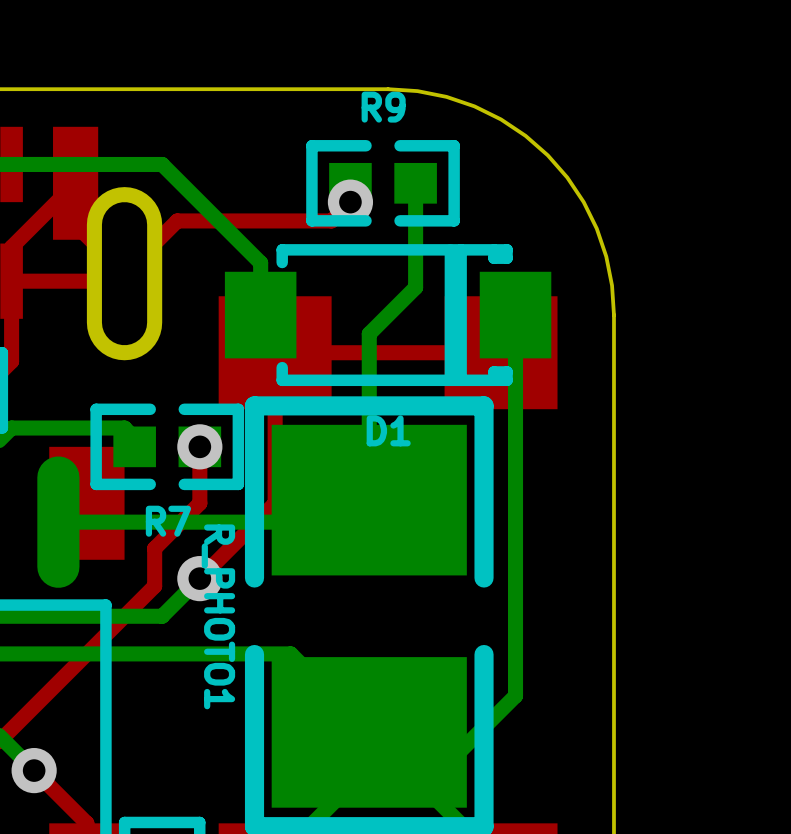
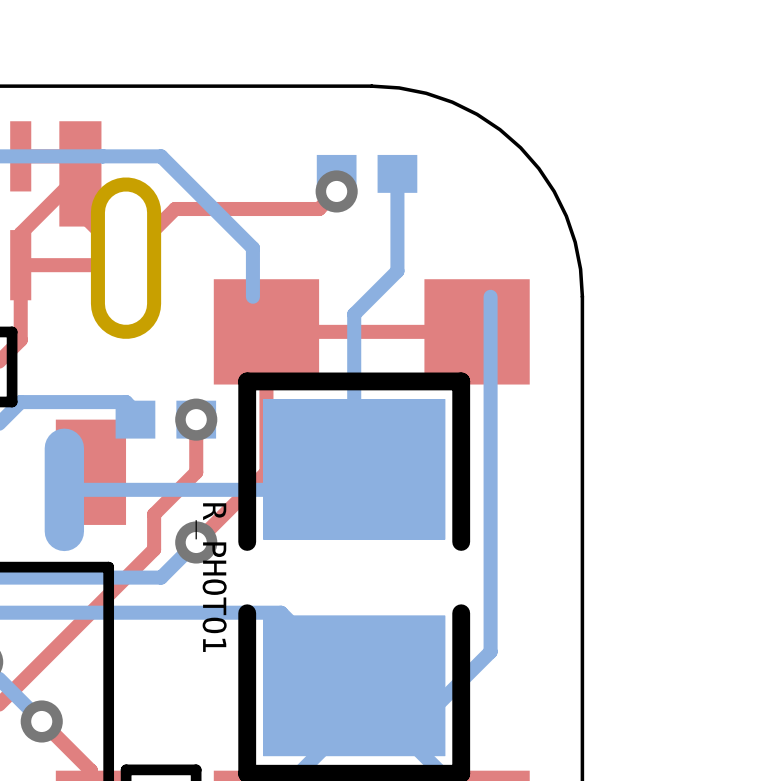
R9: (383, 183) -> none
D1: (388, 315) -> none
R7: (167, 446) -> none
part: none -> (354, 577)

